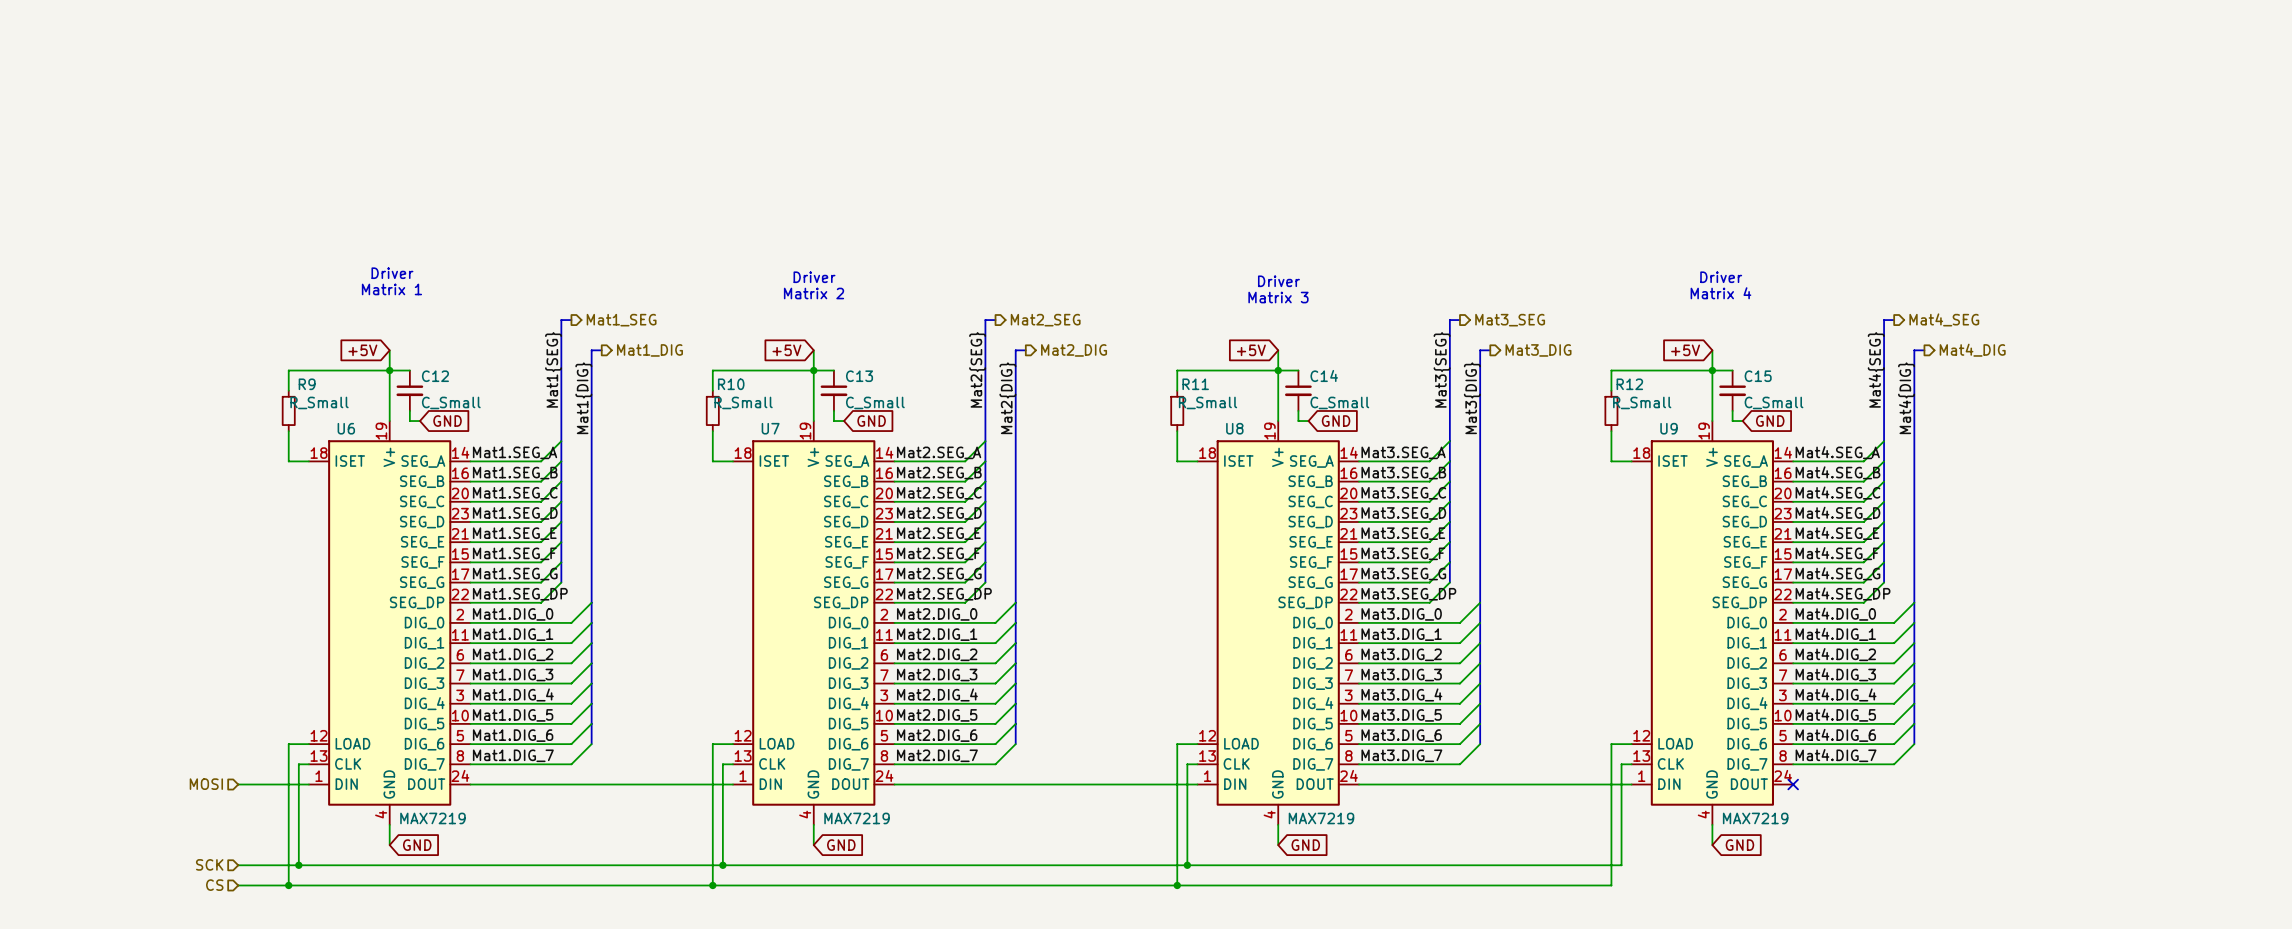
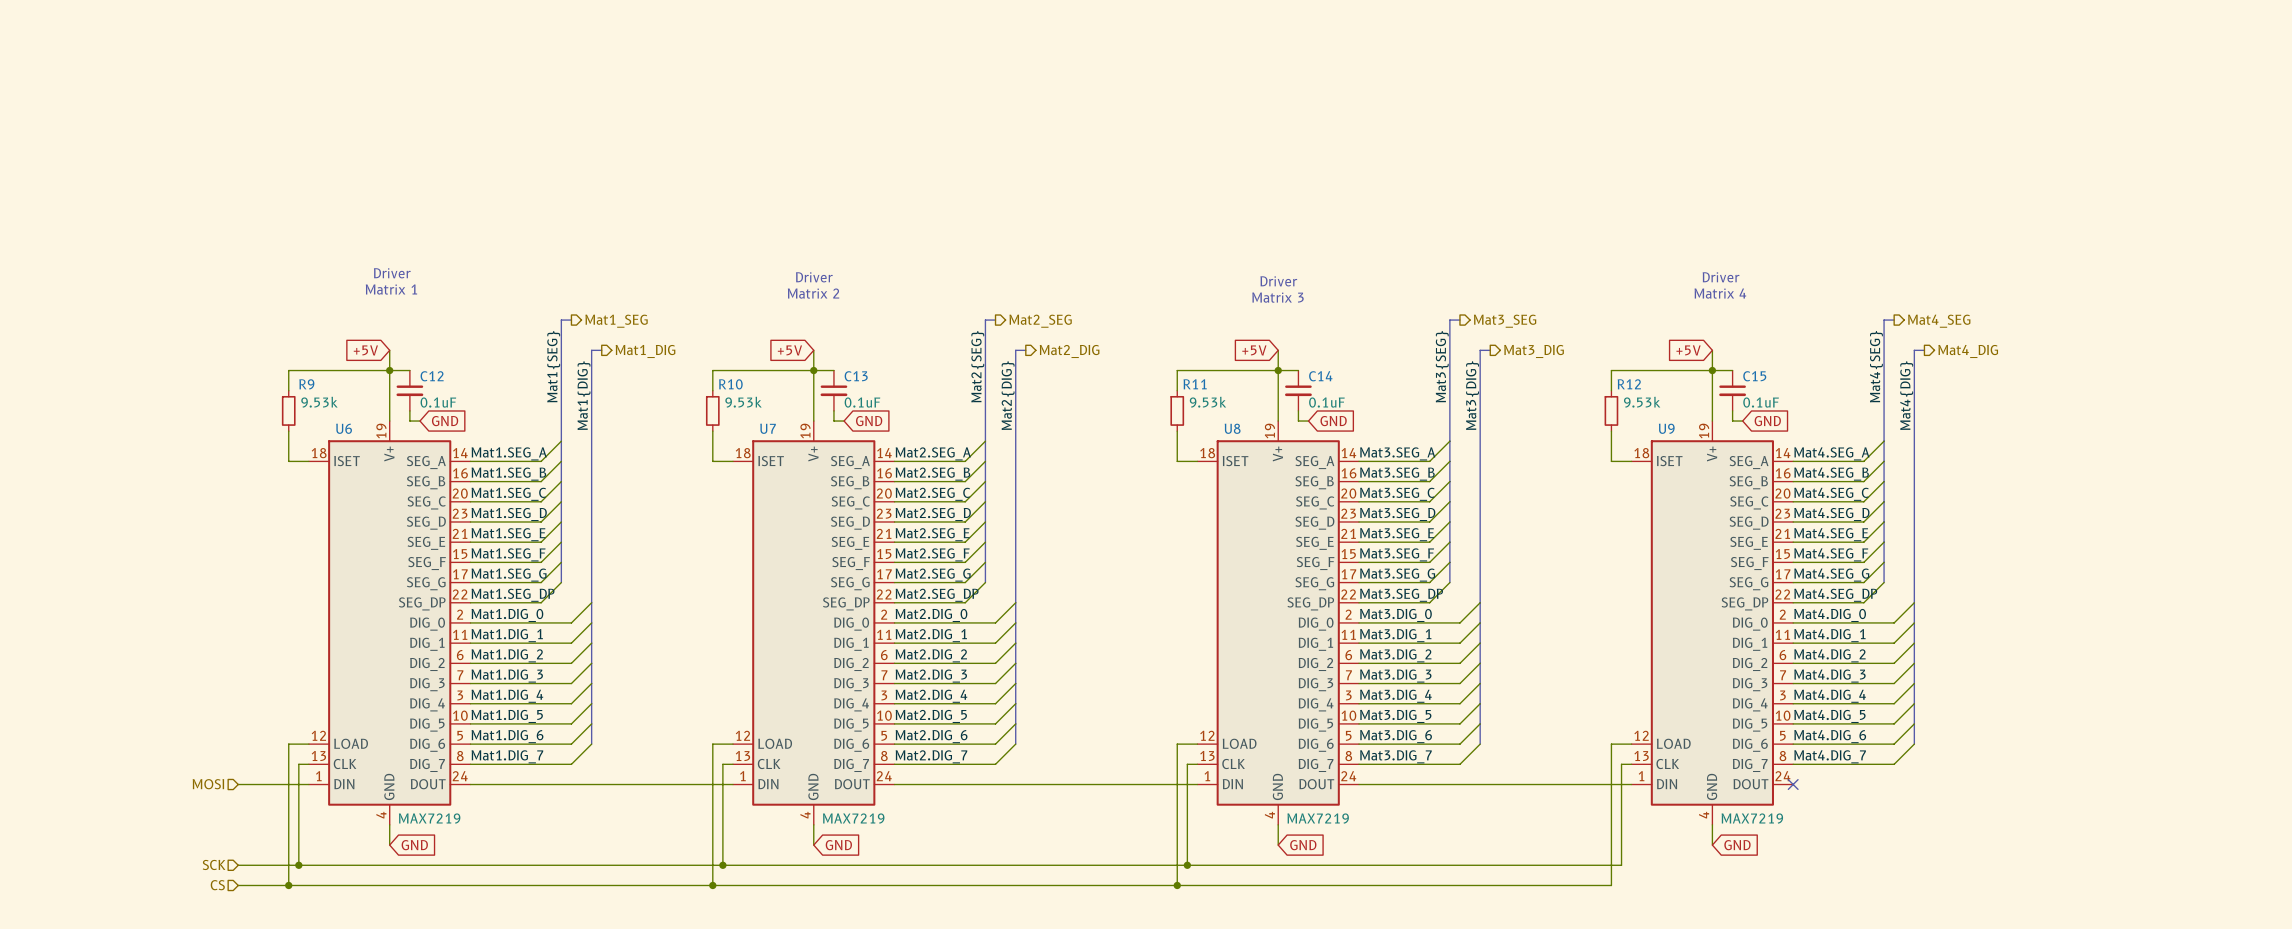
R9 value: R_Small (319, 402) -> 9.53k (319, 402)
C12 value: C_Small (451, 402) -> 0.1uF (438, 402)
R10 value: R_Small (743, 402) -> 9.53k (743, 402)
C13 value: C_Small (875, 402) -> 0.1uF (862, 402)
R11 value: R_Small (1208, 402) -> 9.53k (1207, 402)
C14 value: C_Small (1339, 402) -> 0.1uF (1326, 402)
R12 value: R_Small (1642, 402) -> 9.53k (1642, 402)
C15 value: C_Small (1774, 402) -> 0.1uF (1761, 402)

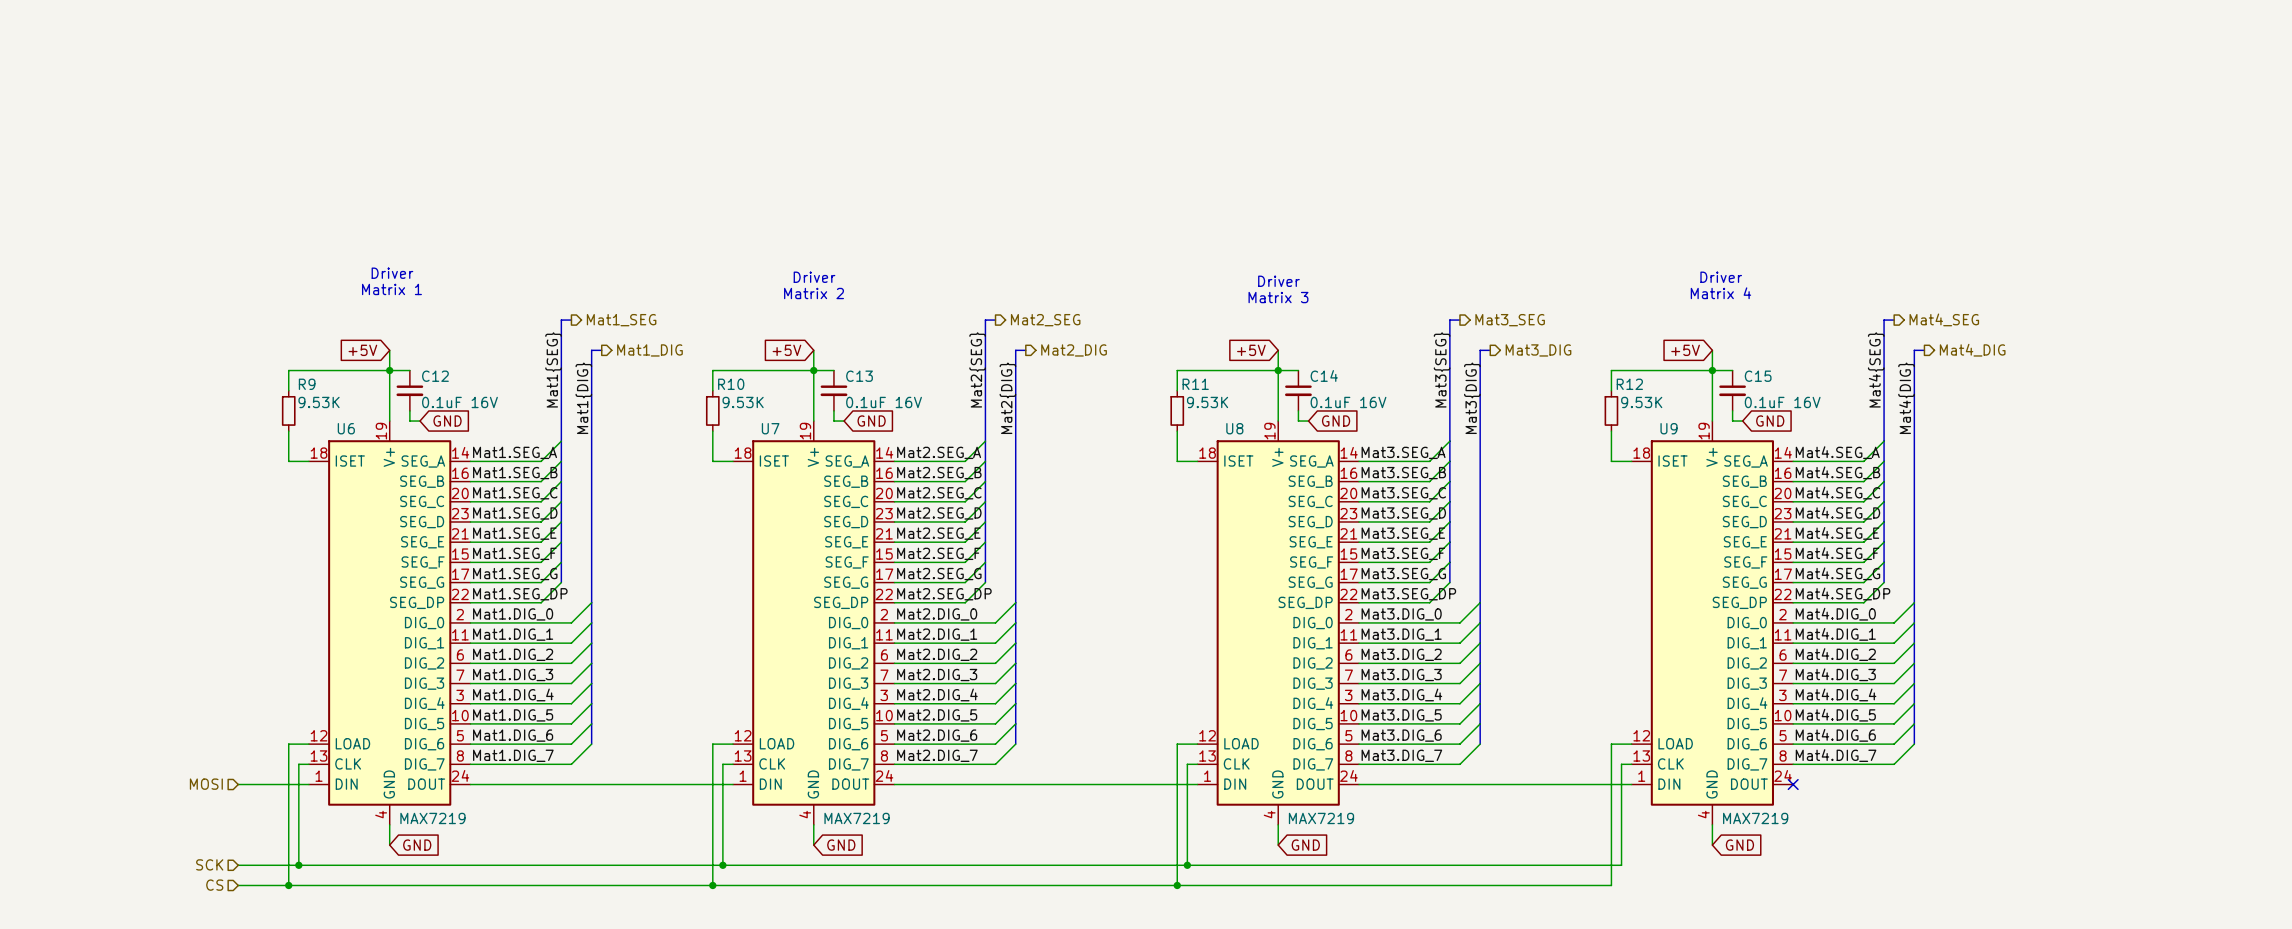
R9 value: 9.53k (319, 402) -> 9.53K (319, 402)
C12 value: 0.1uF (438, 402) -> 0.1uF 16V (459, 402)
R10 value: 9.53k (743, 402) -> 9.53K (743, 402)
C13 value: 0.1uF (862, 402) -> 0.1uF 16V (884, 402)
R11 value: 9.53k (1207, 402) -> 9.53K (1207, 402)
C14 value: 0.1uF (1326, 402) -> 0.1uF 16V (1348, 402)
R12 value: 9.53k (1642, 402) -> 9.53K (1641, 402)
C15 value: 0.1uF (1761, 402) -> 0.1uF 16V (1782, 402)

